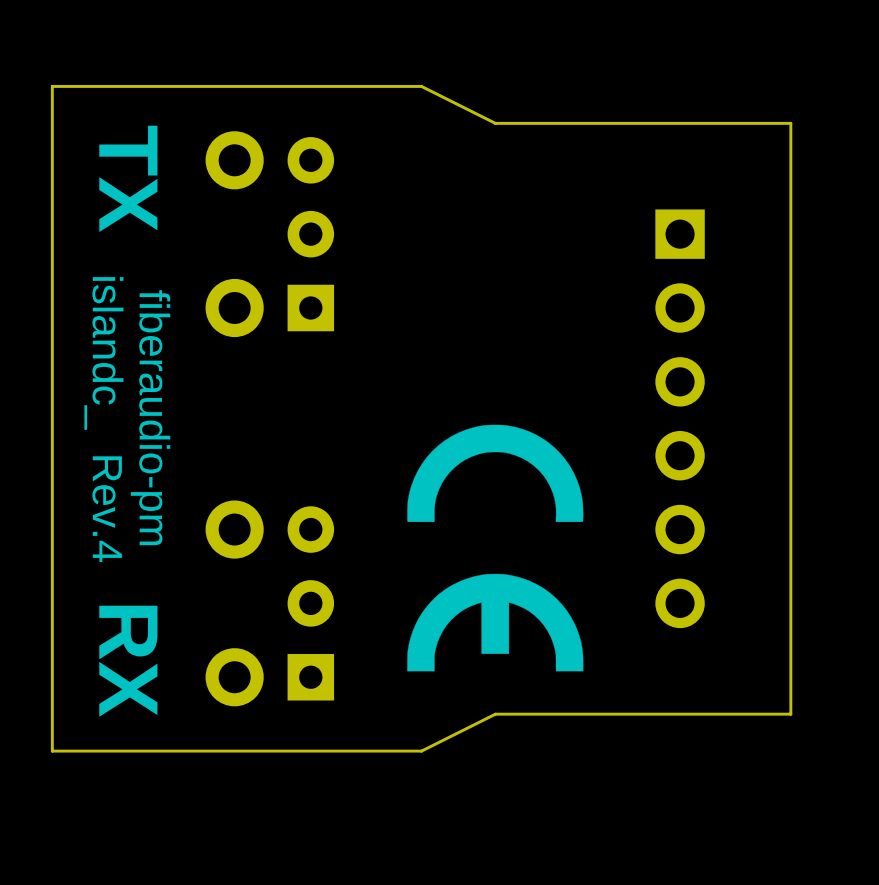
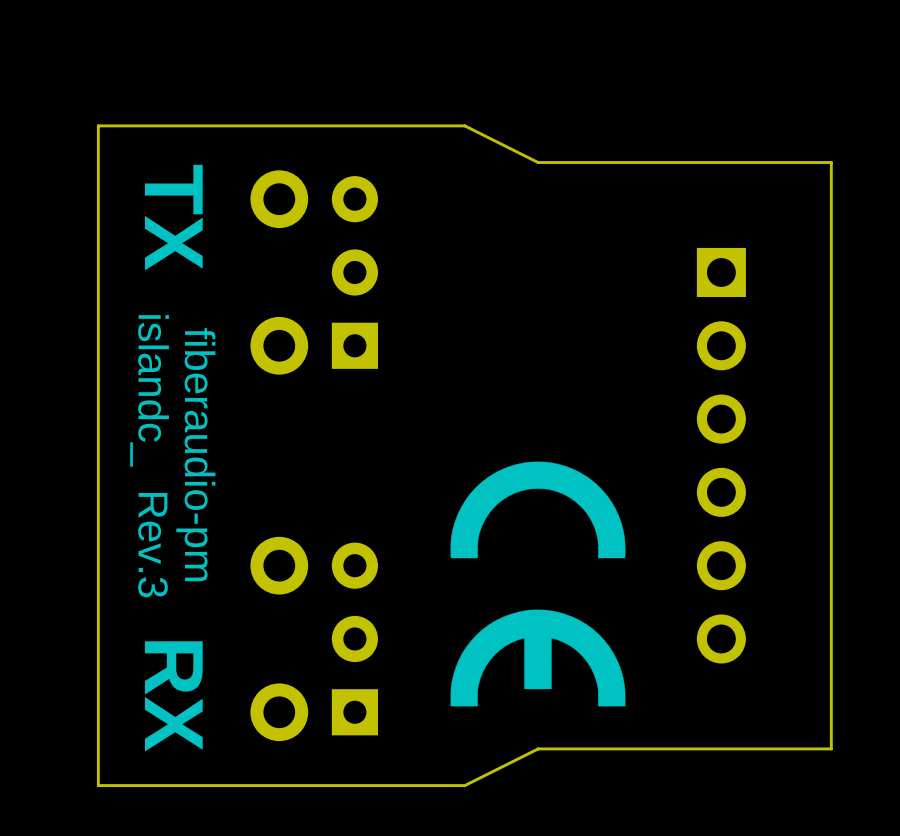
text: islandc_ Rev.4 (103, 419) -> islandc_ Rev.3 (149, 456)

